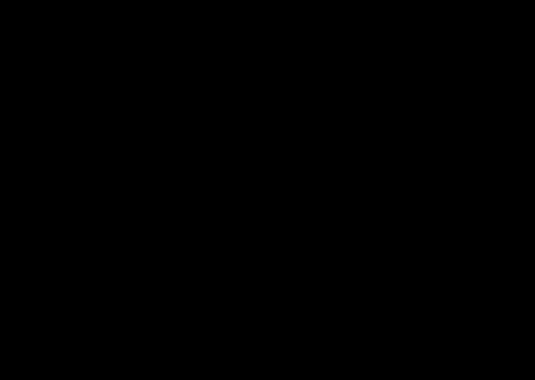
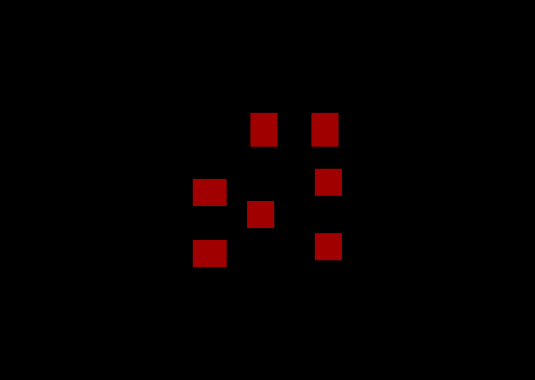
part: none -> (294, 129)
part: none -> (294, 214)
part: none -> (209, 222)

